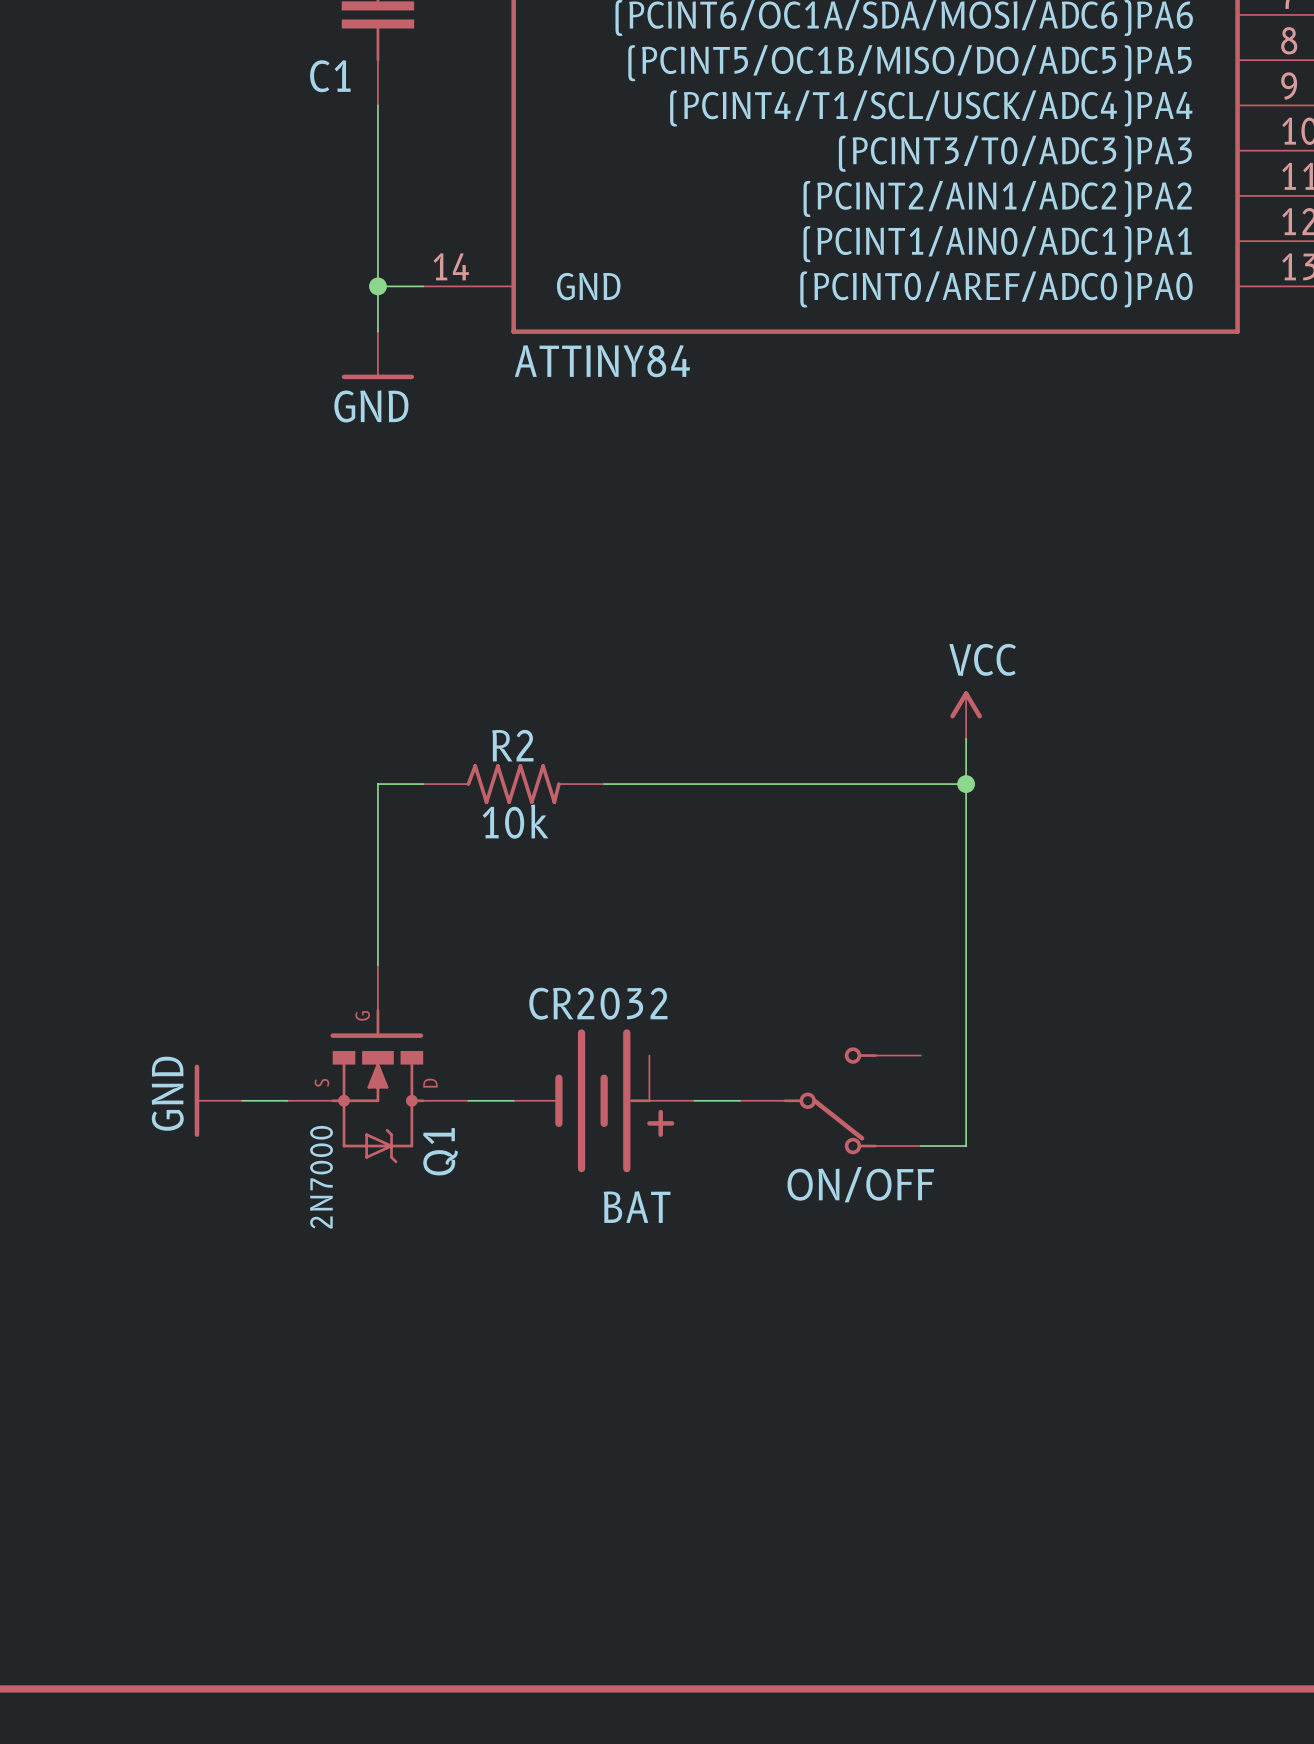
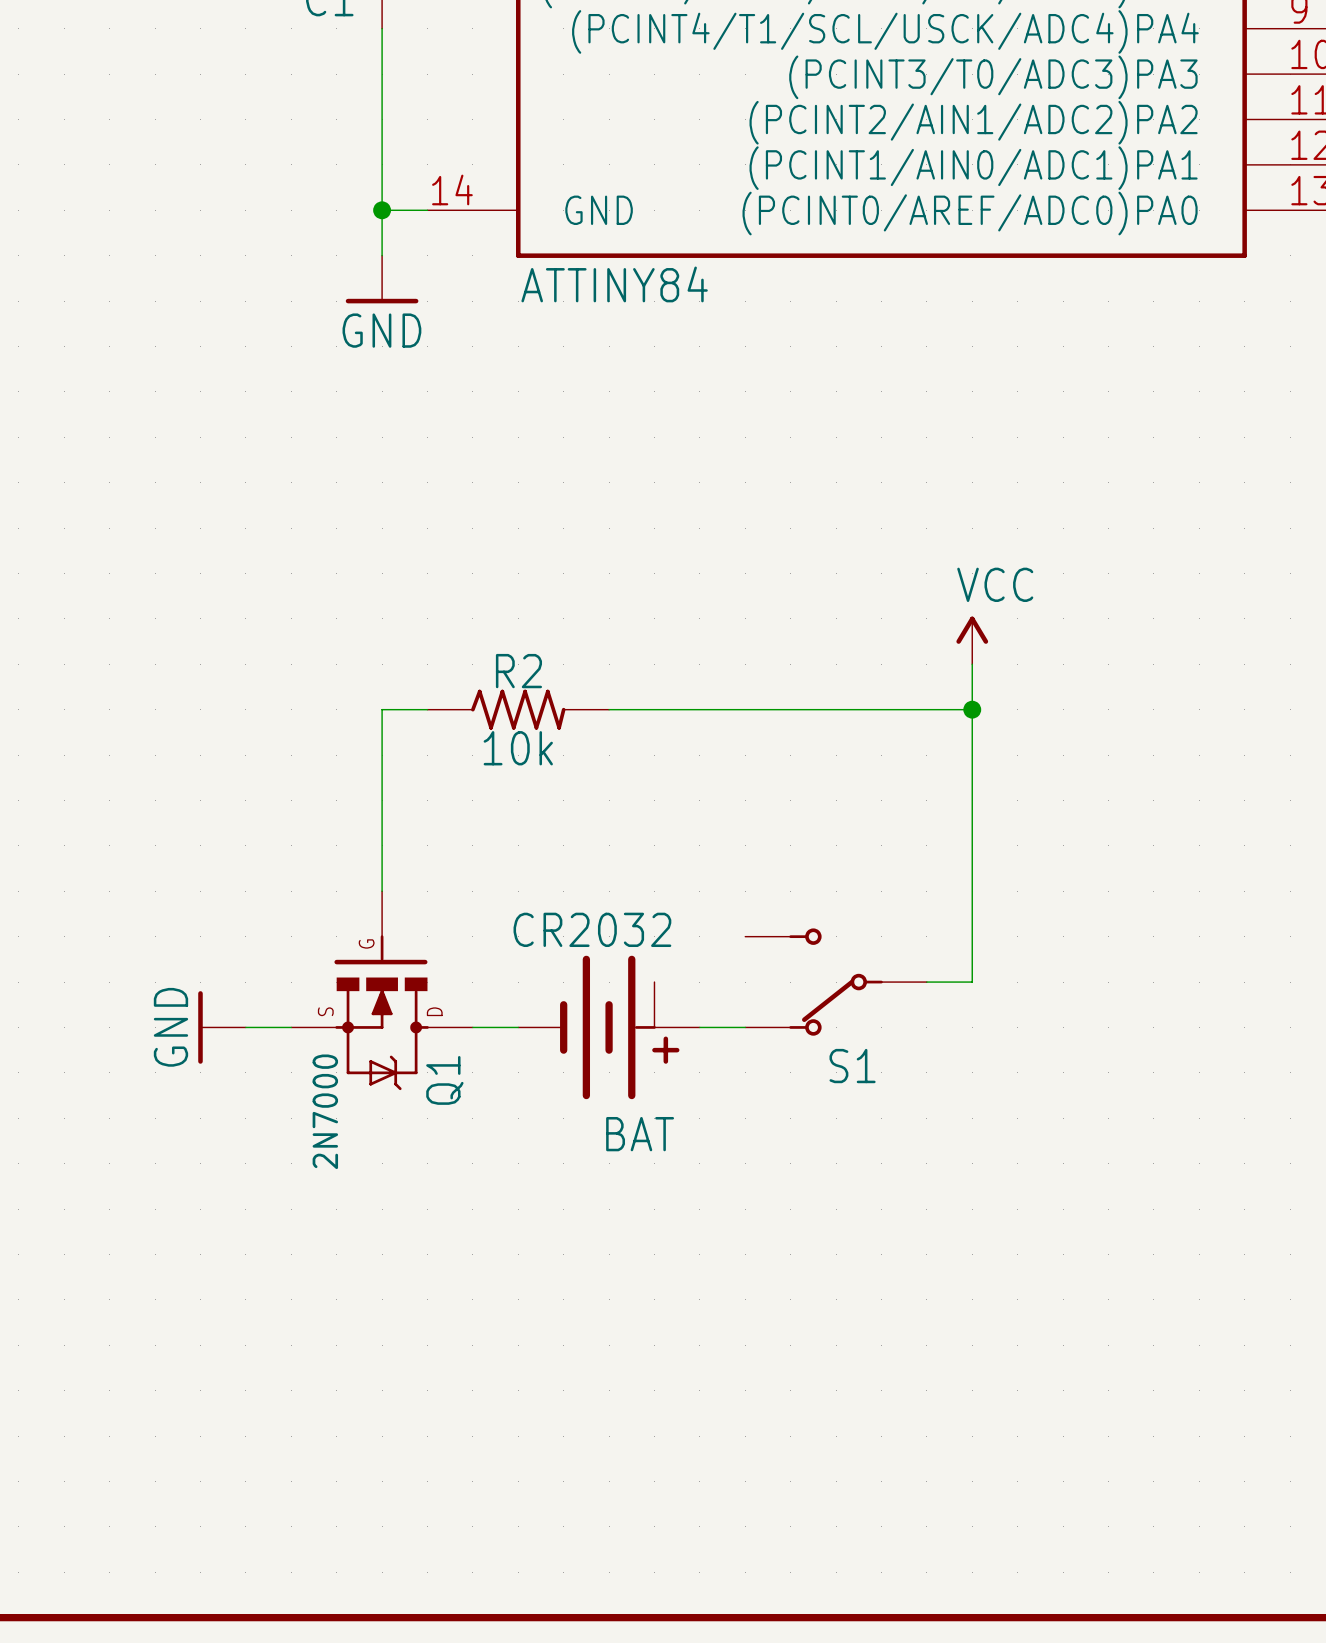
S1: none -> (836, 982)
wire: (966, 1055) (966, 1146) (920, 1146) -> (972, 982) (926, 982)
ON/OFF: (830, 1100) -> none

